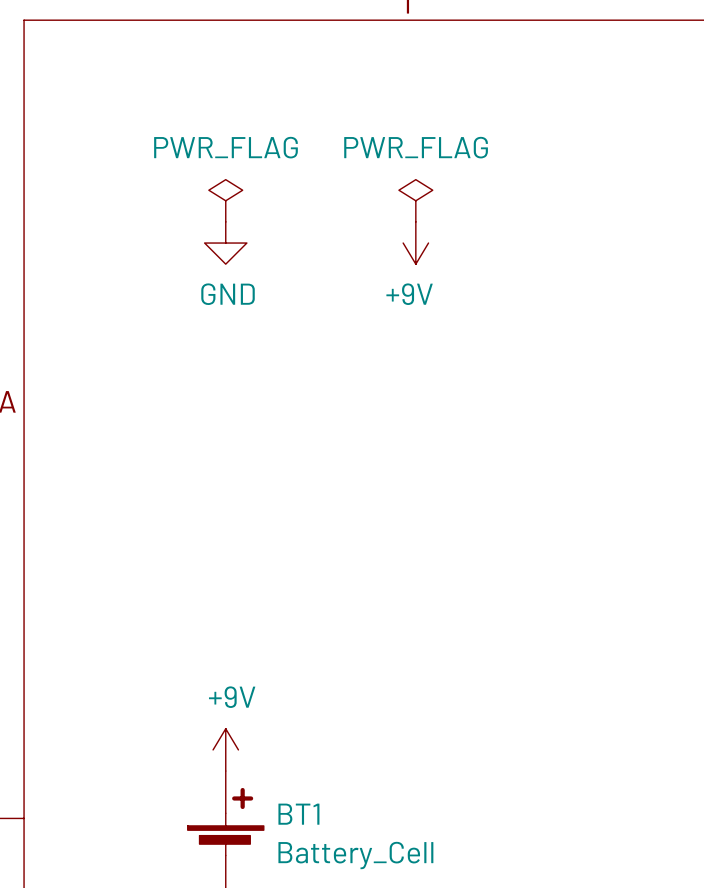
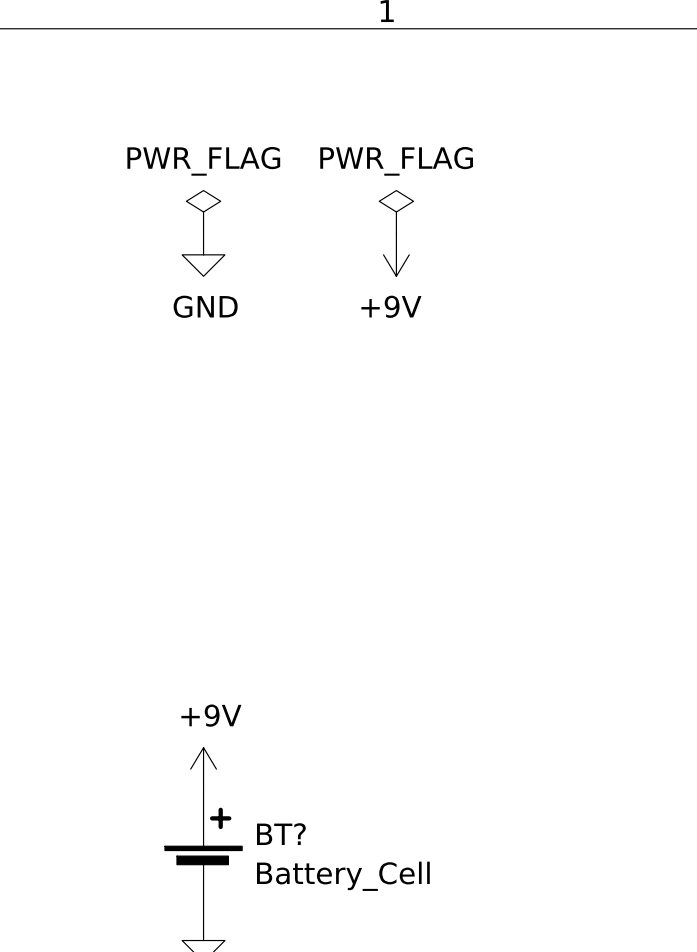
BT1 name: BT1 (298, 814) -> BT? (281, 834)

